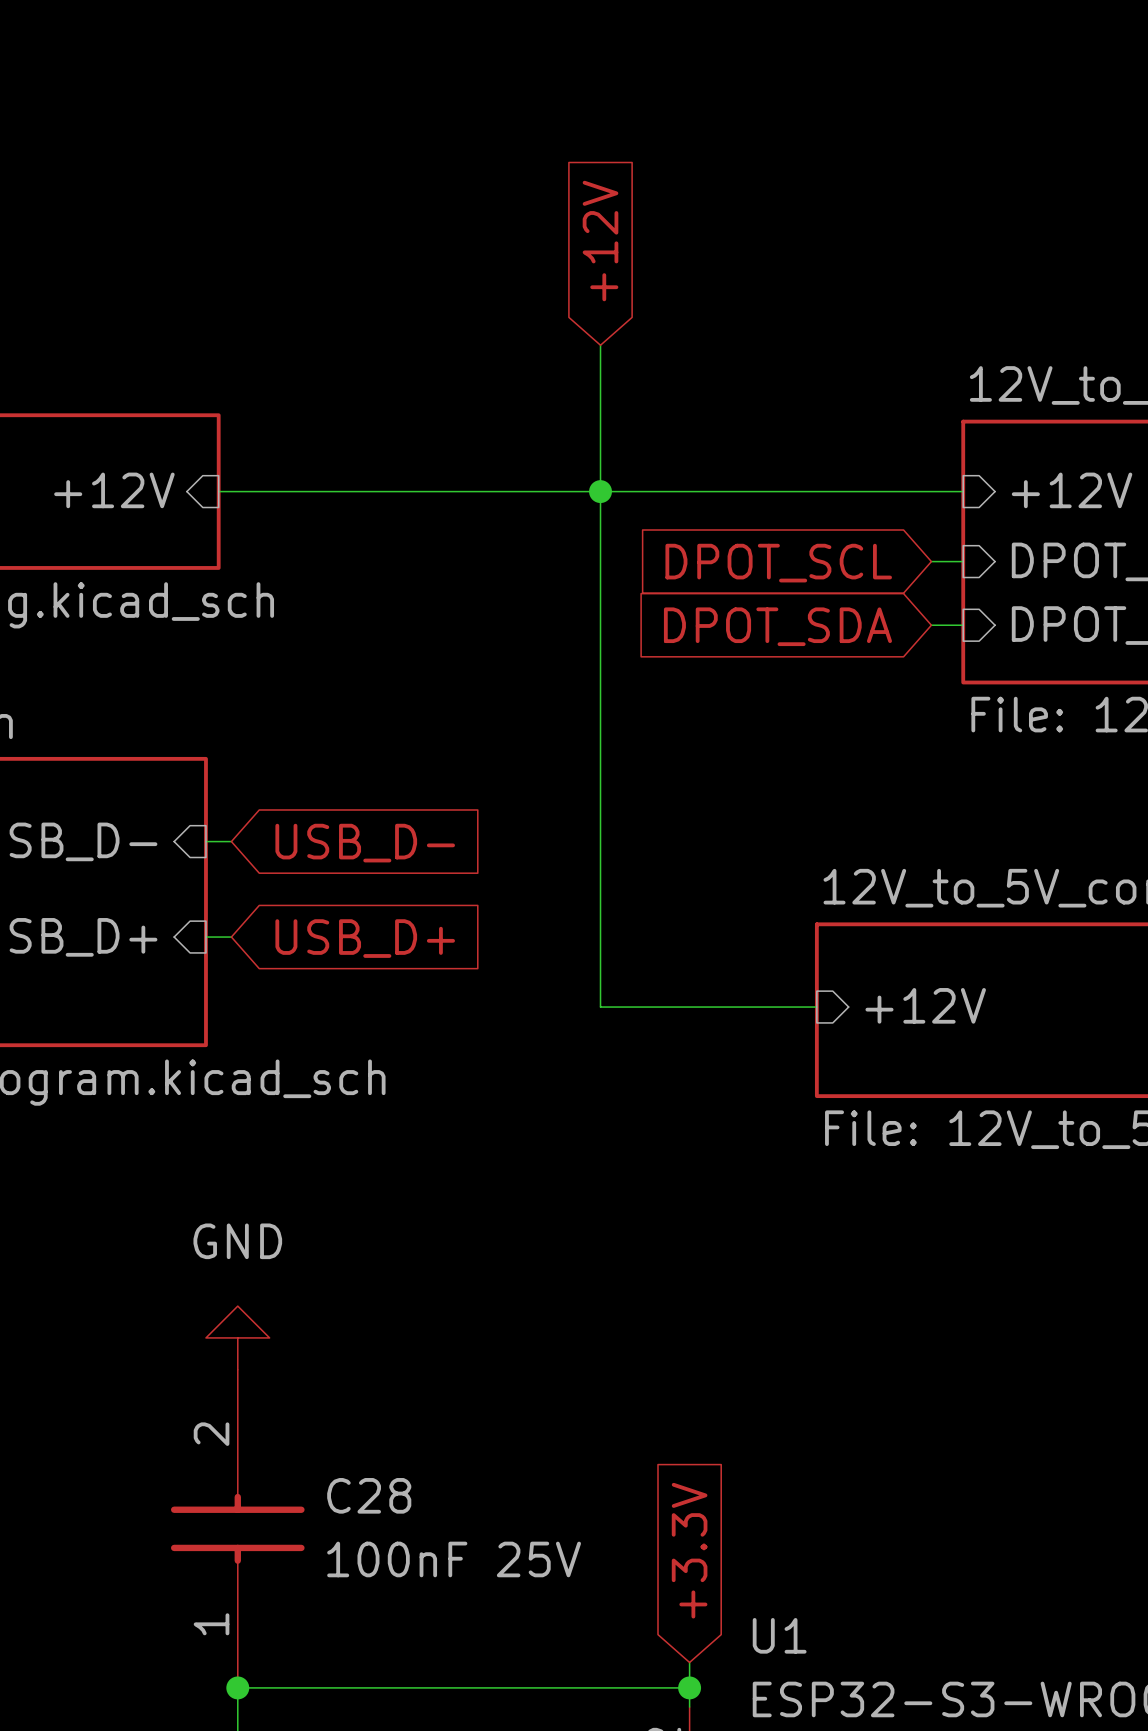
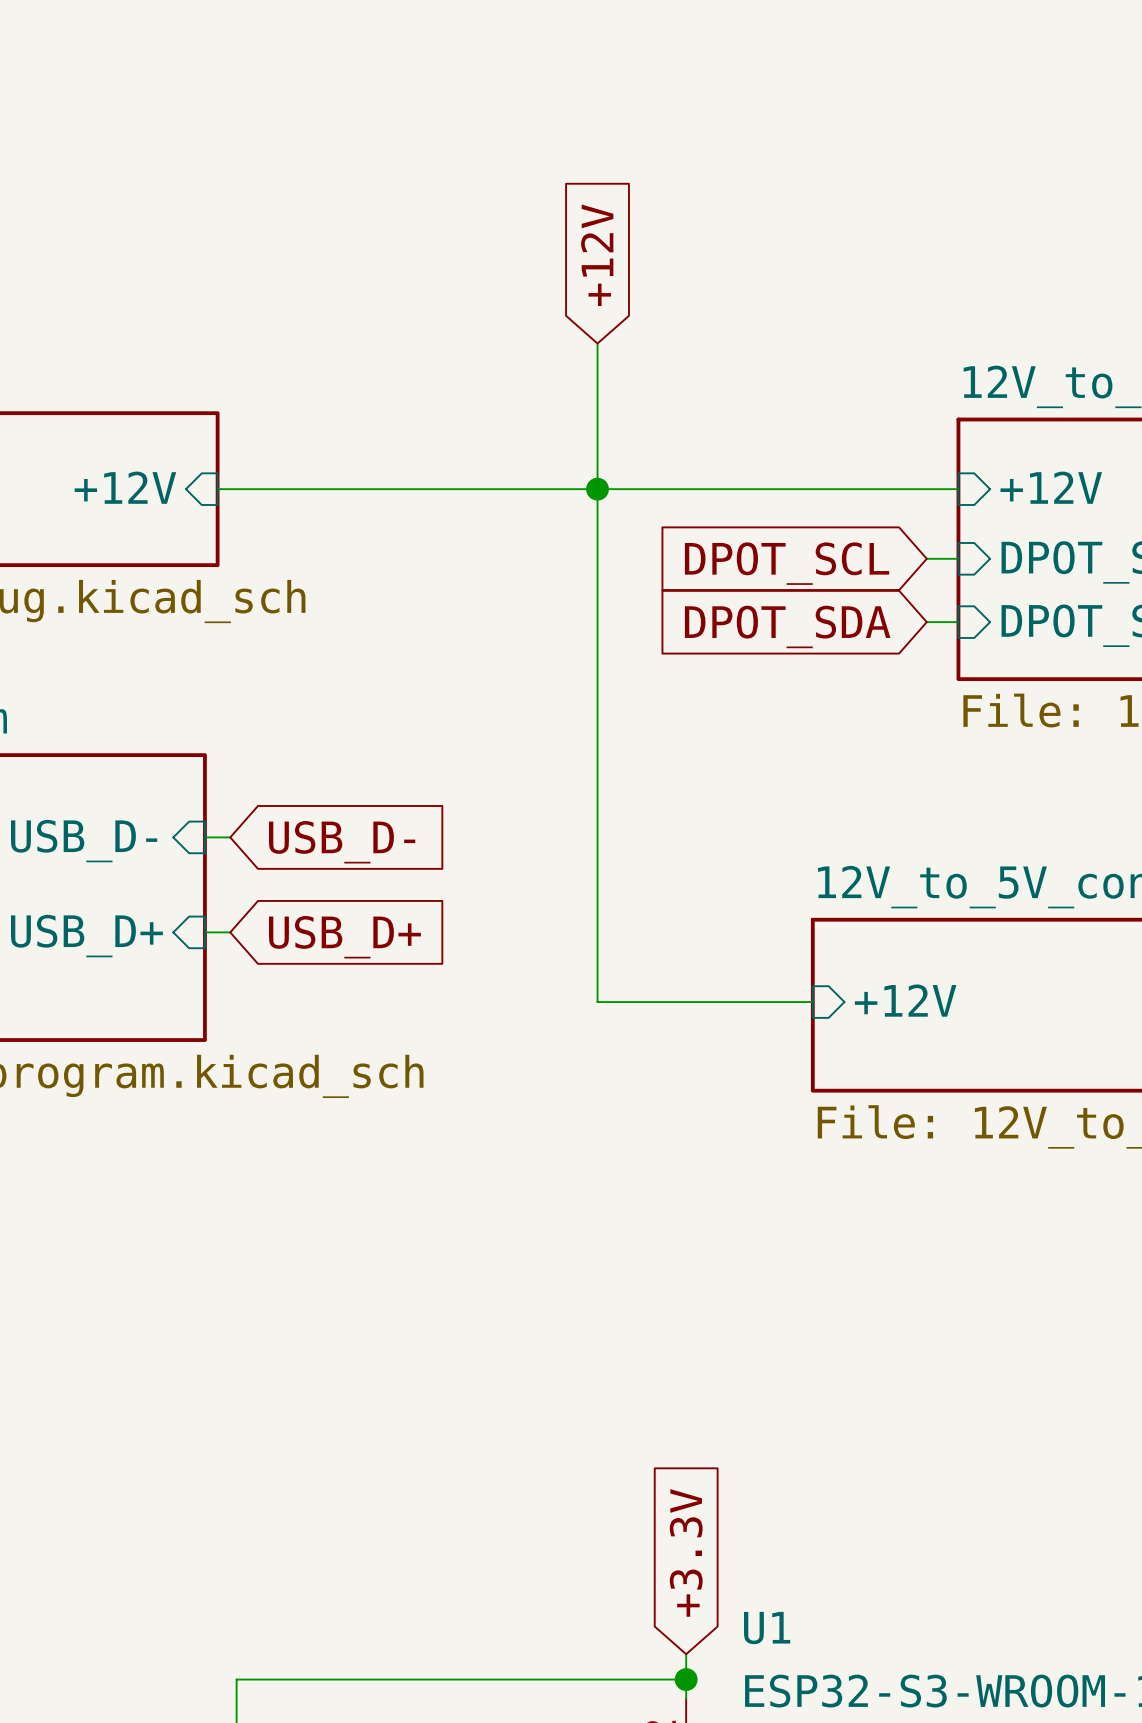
power symbol: GND (237, 1337) -> none
C28: 100nF 25V (237, 1528) -> none
junction: (237, 1687) -> none

